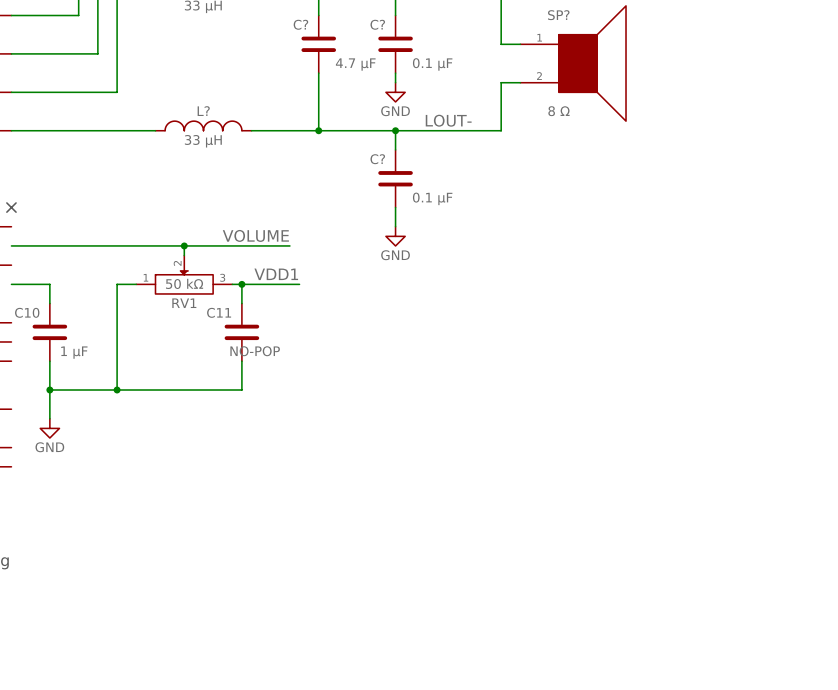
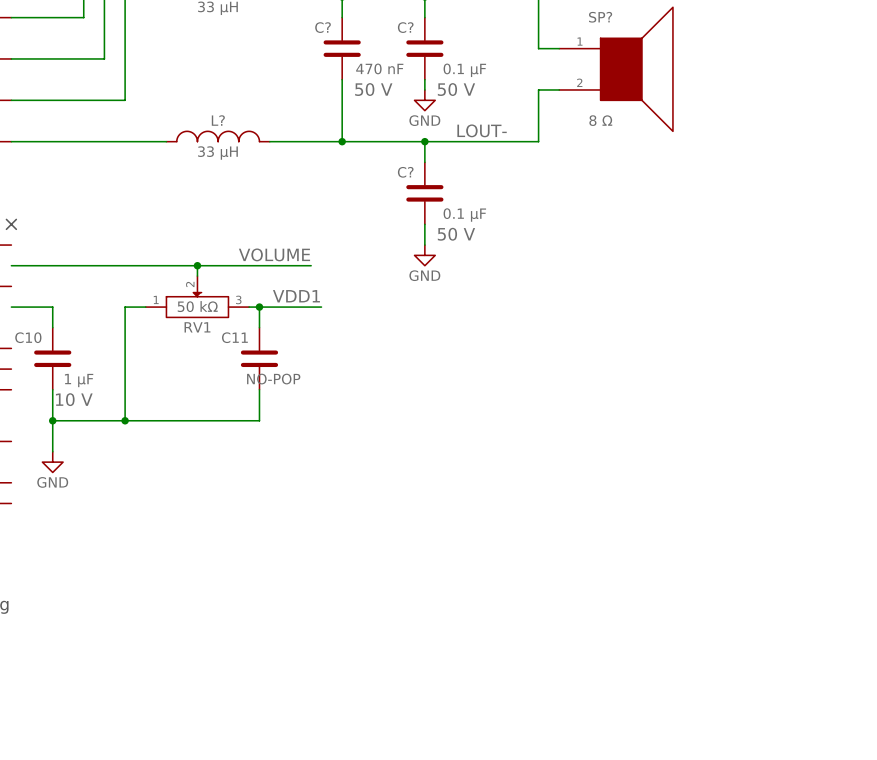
C? value: 4.7 μF (355, 64) -> 470 nF (379, 68)
C? text: none -> 50 V (373, 89)
C? text: none -> 50 V (456, 89)
C? text: none -> 50 V (456, 234)
C10 text: none -> 10 V (74, 399)

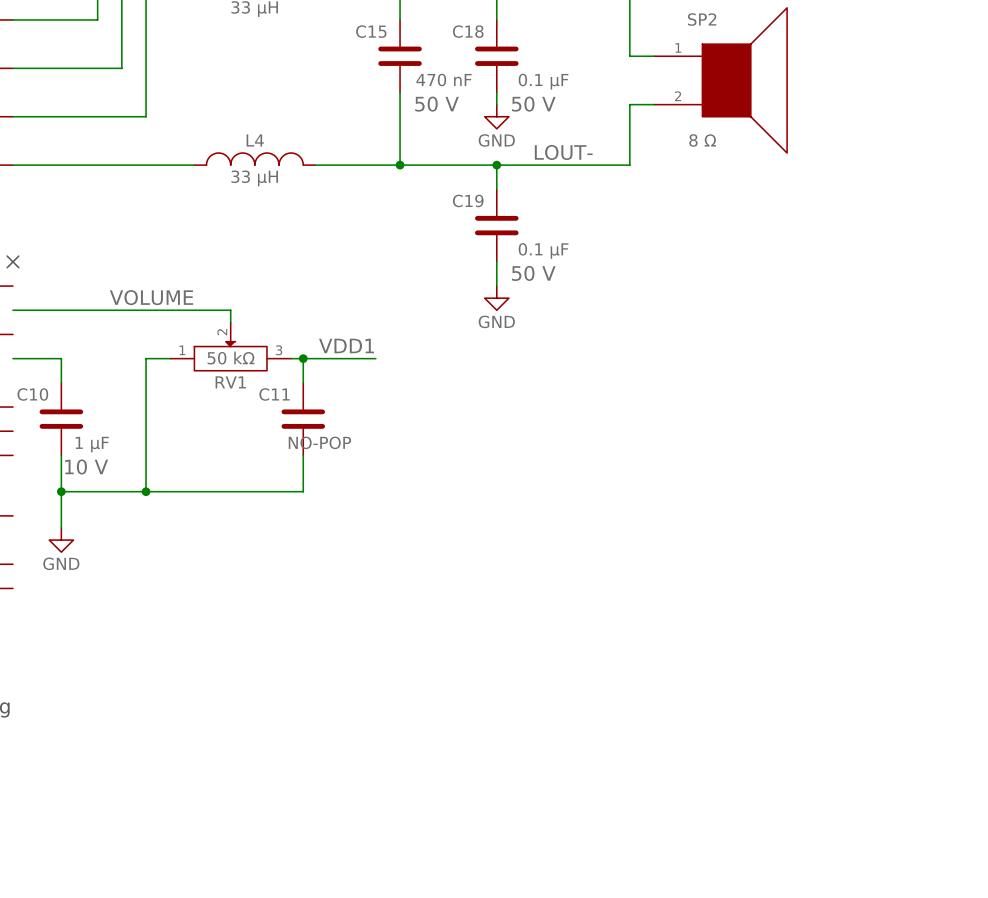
SP? name: SP? (600, 17) -> SP2 (702, 19)
C? name: C? (323, 27) -> C15 (371, 31)
C? name: C? (405, 27) -> C18 (468, 31)
L? name: L? (218, 120) -> L4 (255, 140)
C? name: C? (405, 172) -> C19 (468, 200)
label position: VOLUME (274, 254) -> VOLUME (151, 297)
wire: (197, 265) (311, 265) -> none
junction: (197, 265) -> none

